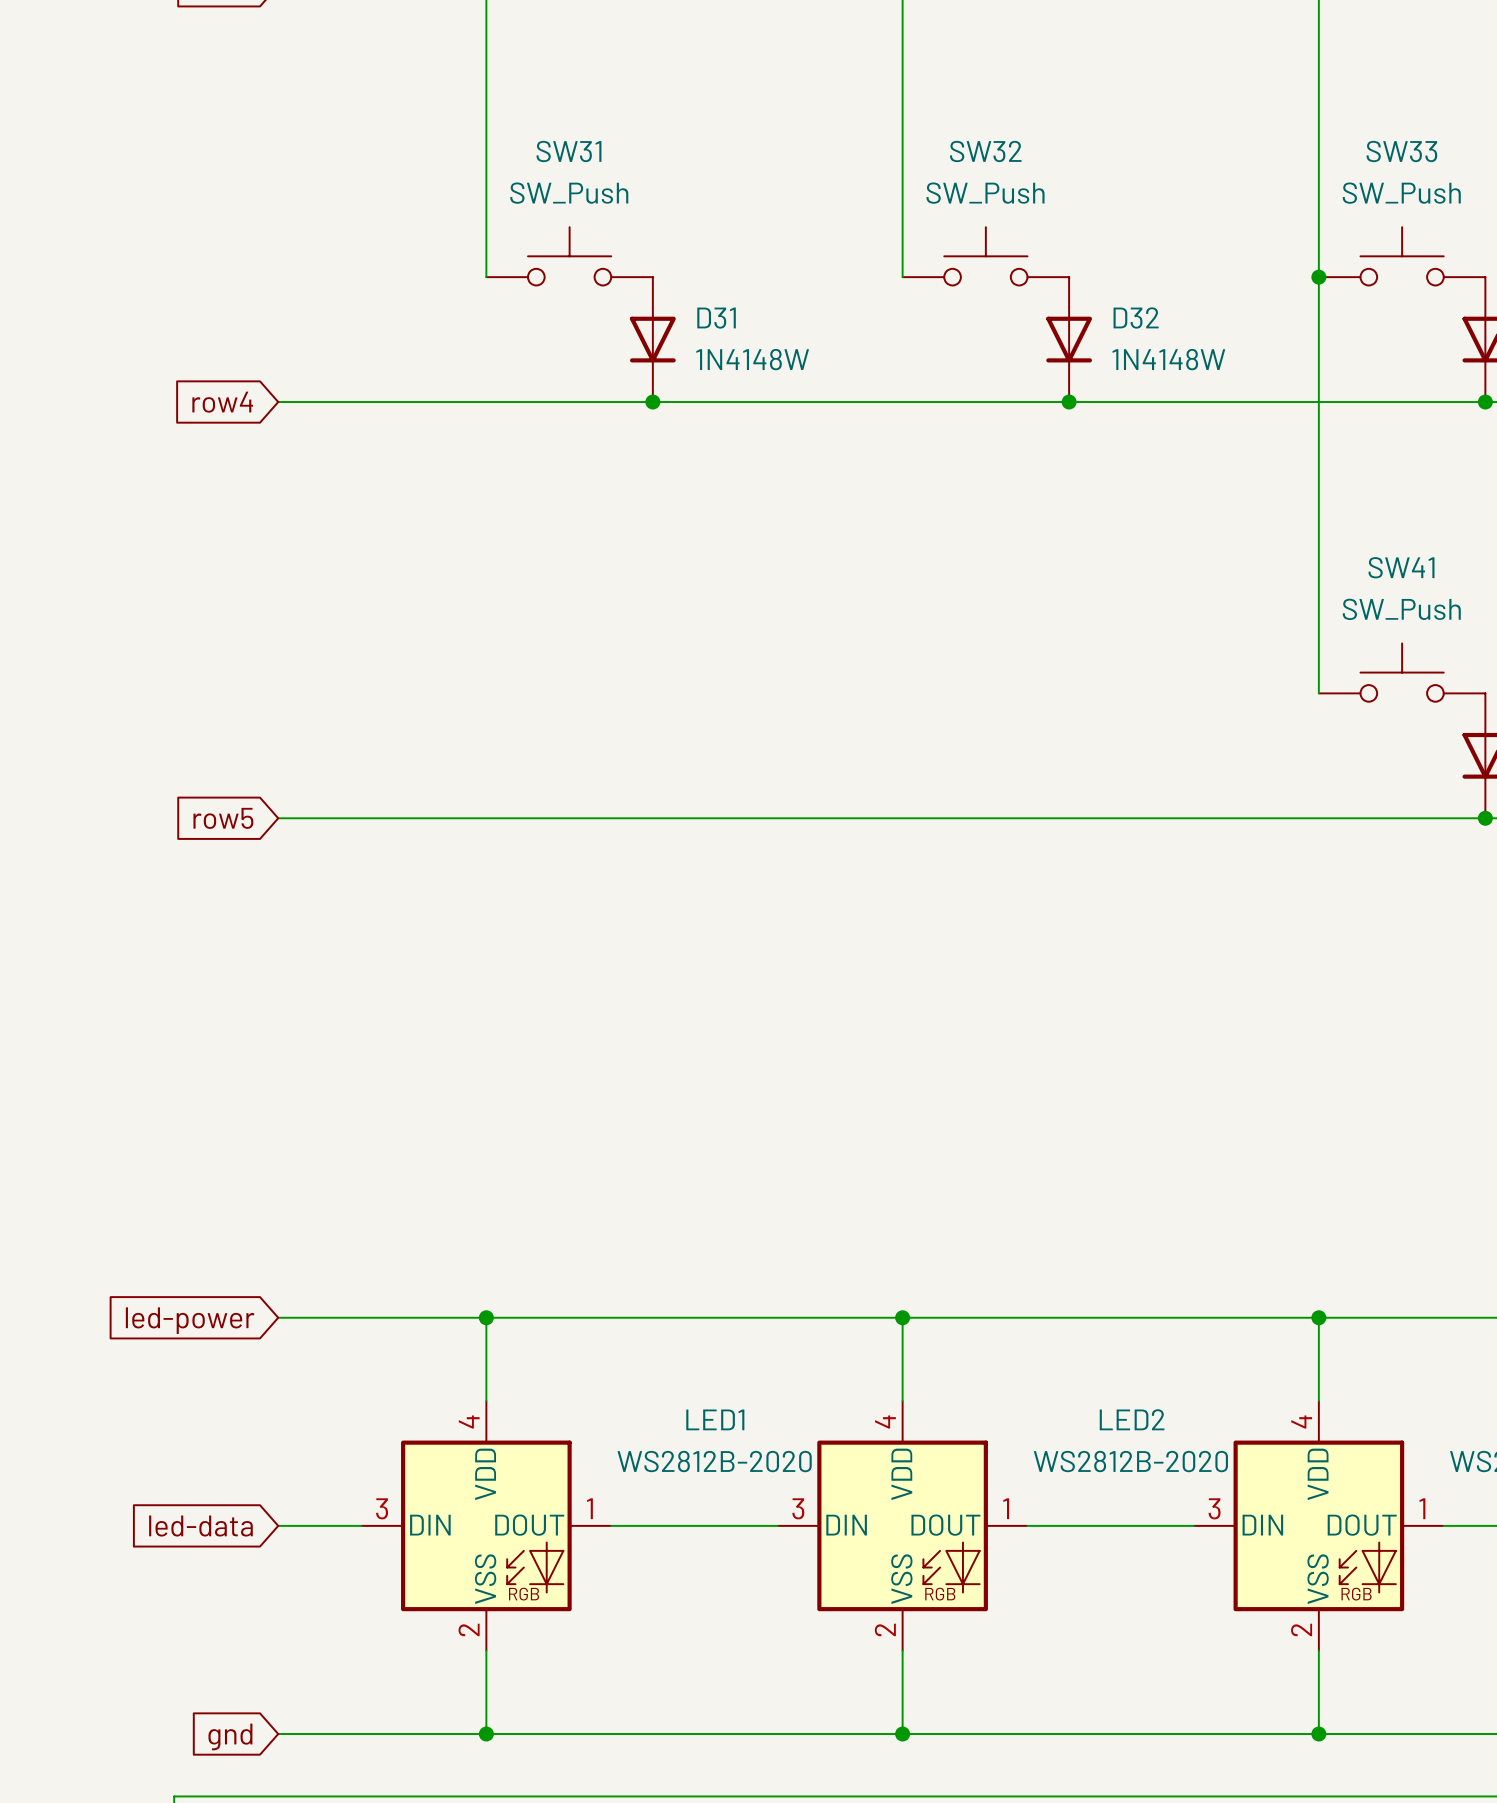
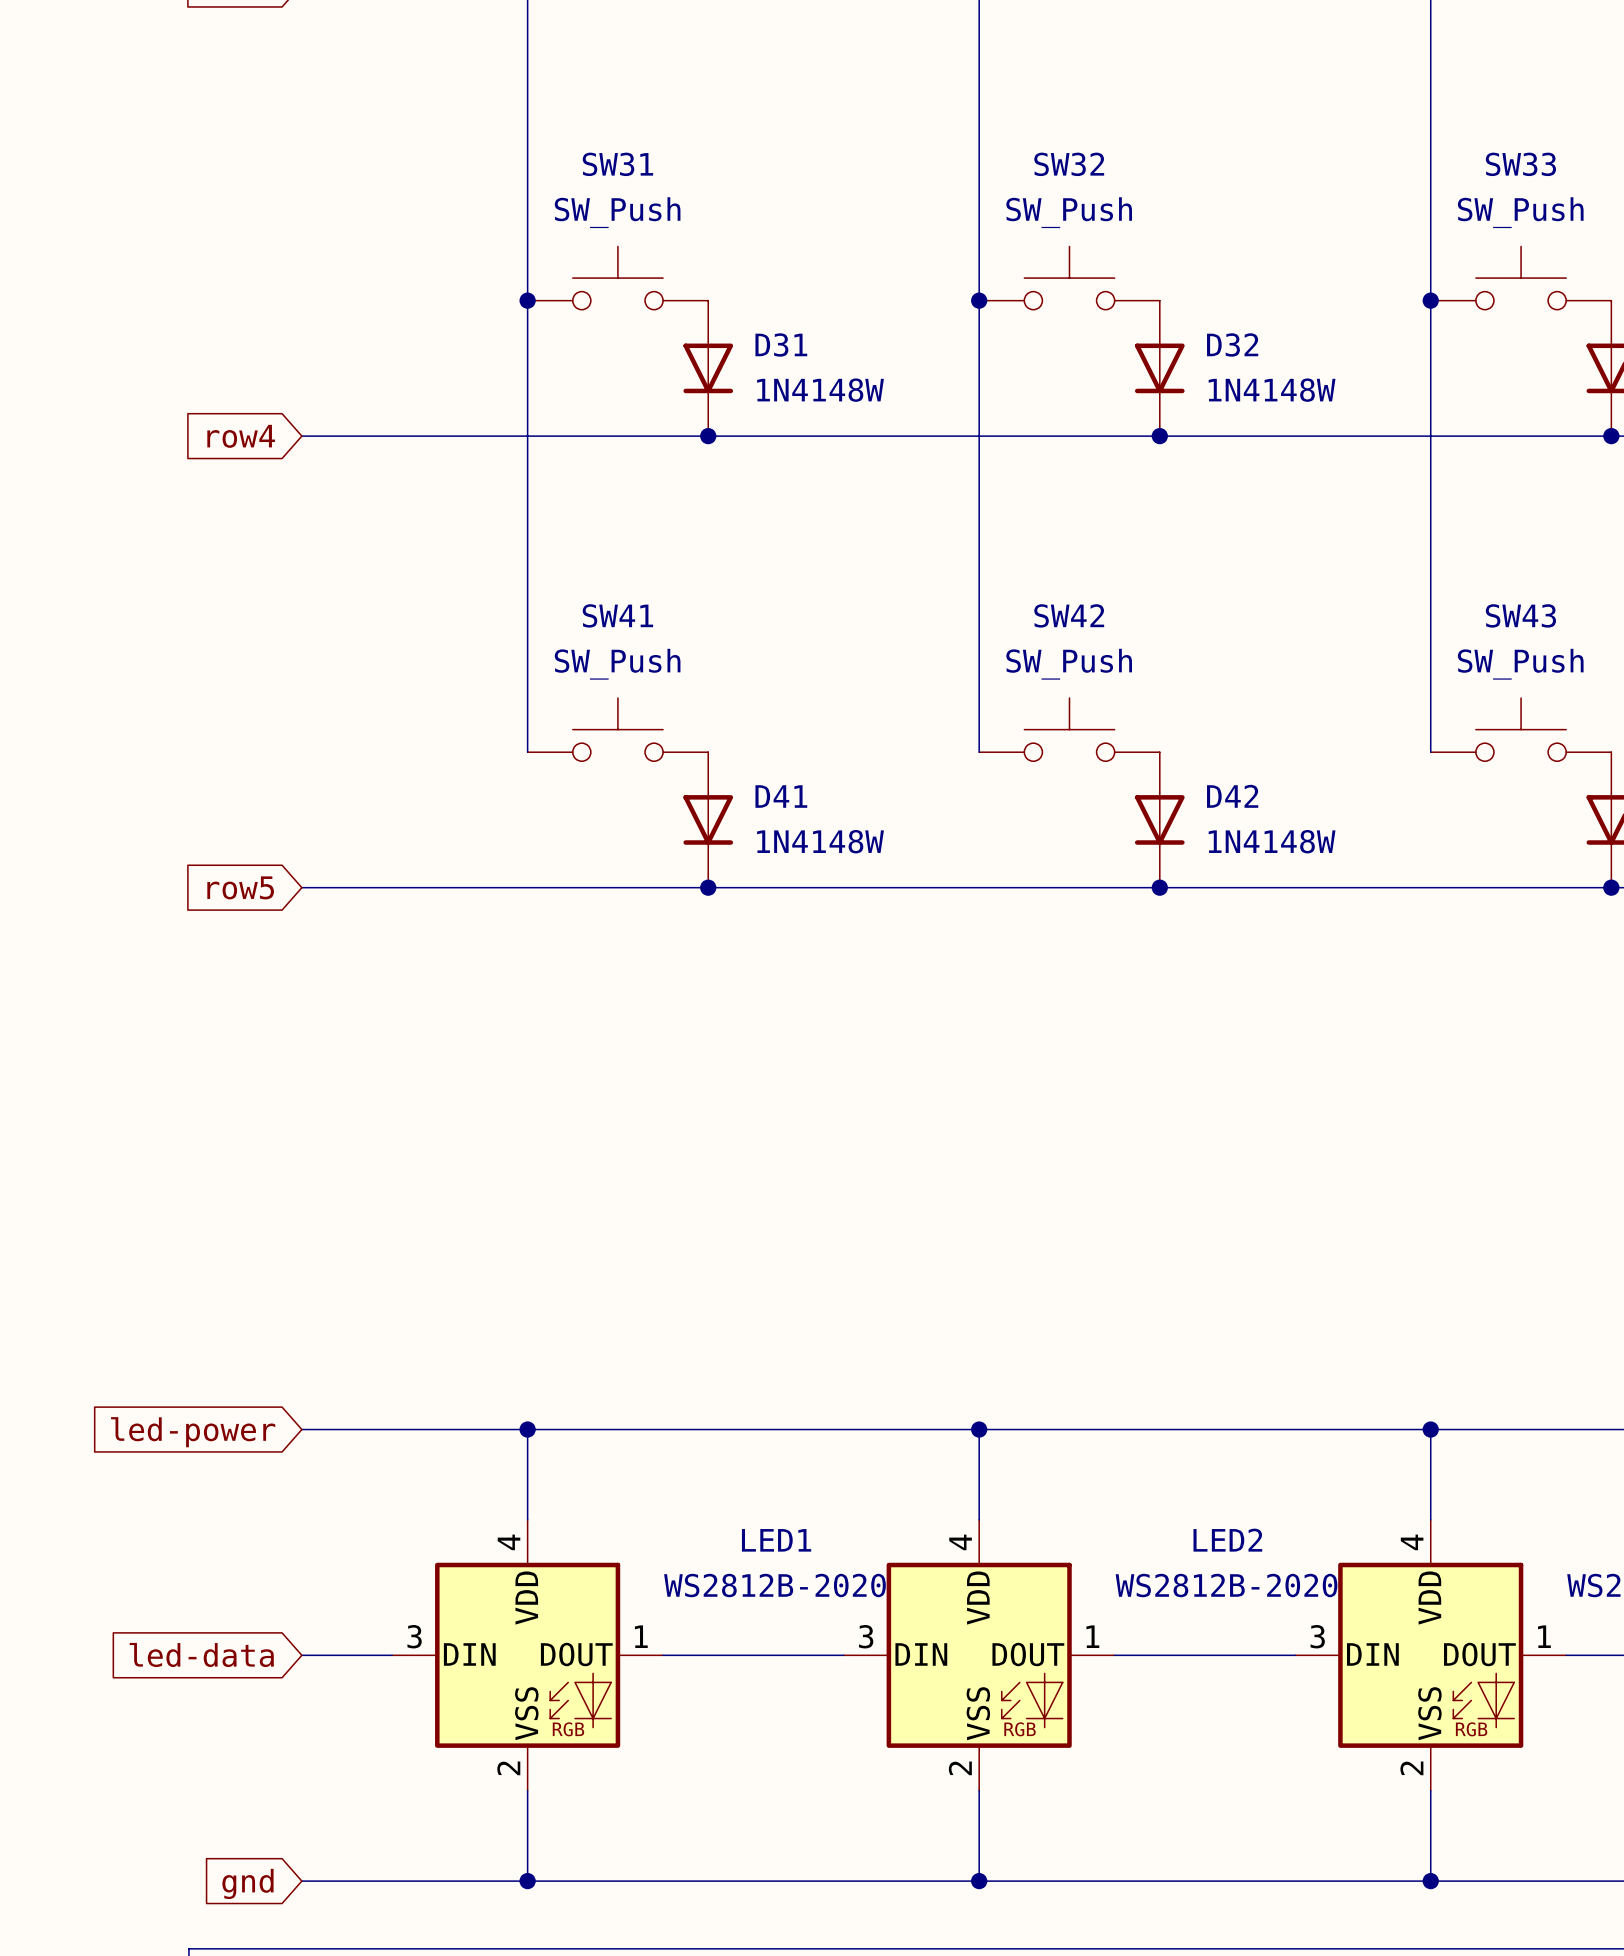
wire: none -> (527, 300) (527, 752)
junction: none -> (527, 300)
wire: none -> (979, 300) (979, 752)
junction: none -> (979, 300)
SW41 name: SW41 (1401, 567) -> SW43 (1520, 615)
SW41: none -> SW_Push (617, 729)
SW42: none -> SW_Push (1069, 729)
D41: none -> 1N4148W (708, 819)
D42: none -> 1N4148W (1159, 819)
junction: none -> (708, 887)
junction: none -> (1159, 887)

